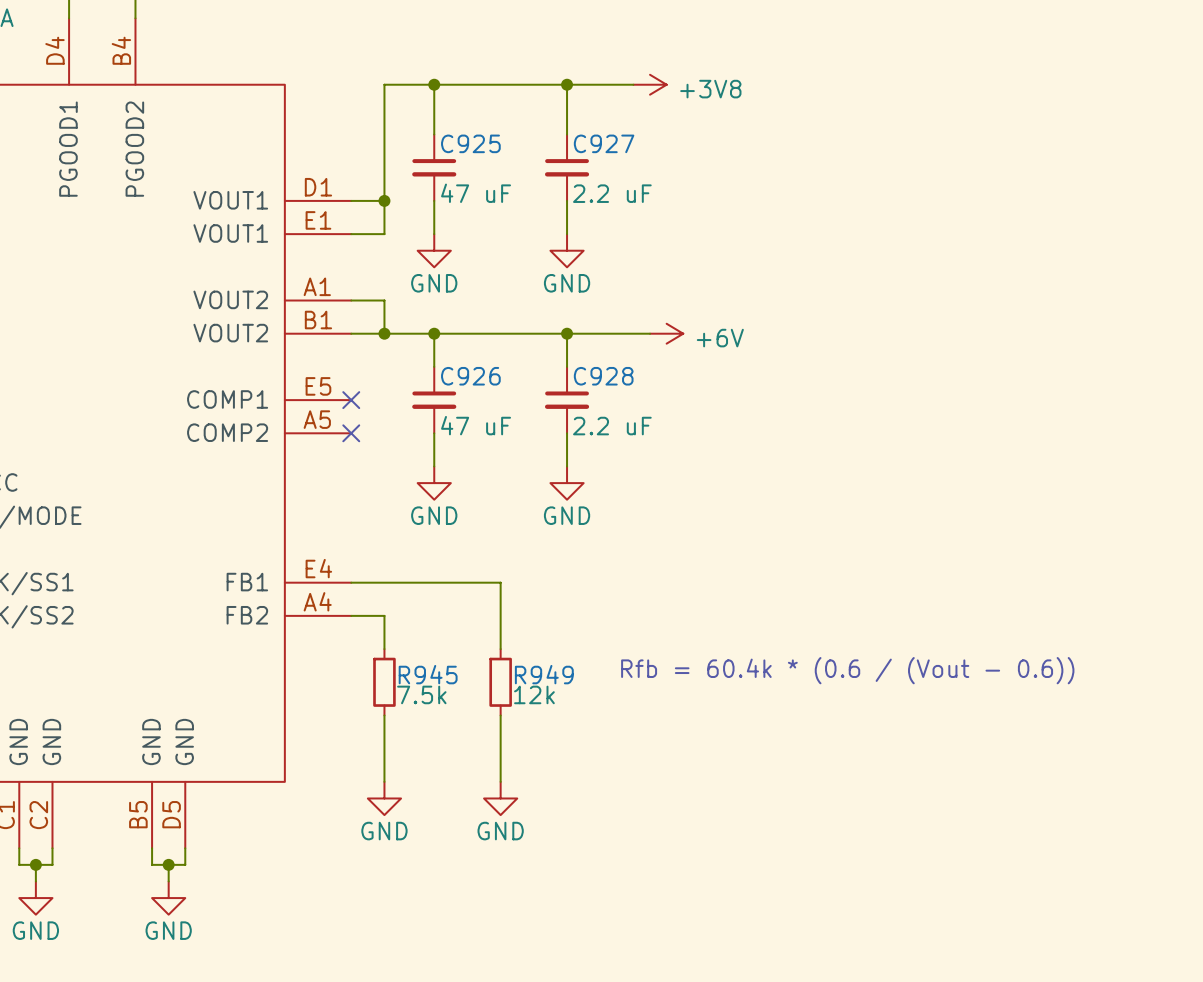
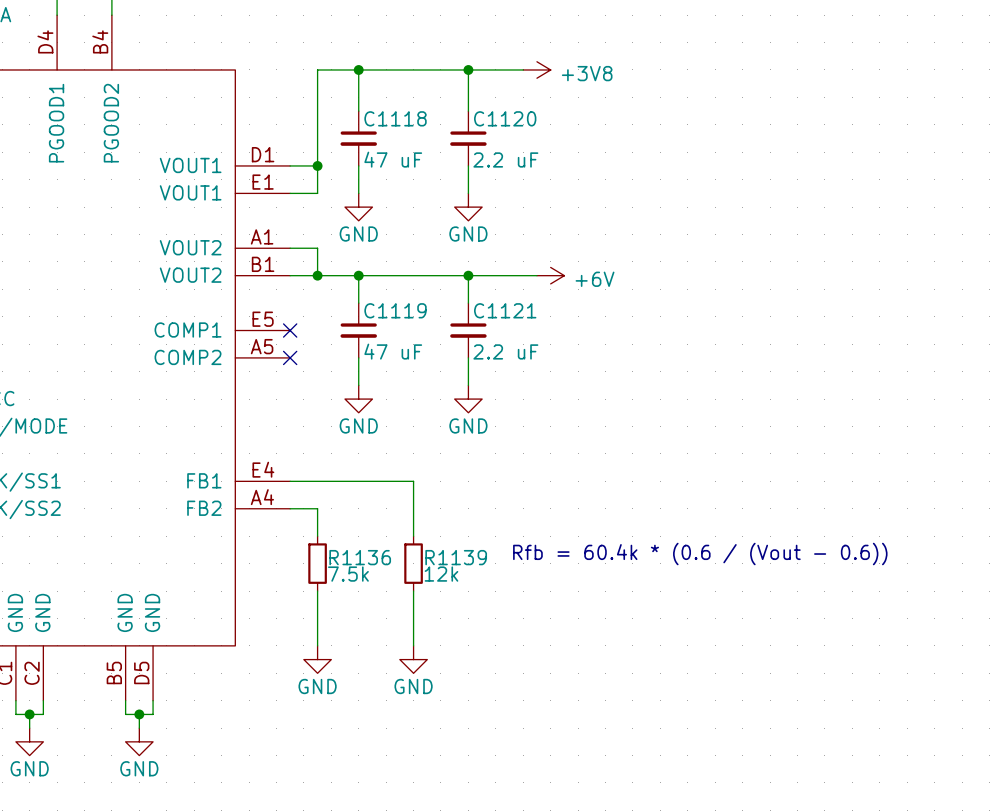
C925 name: C925 (470, 143) -> C1118 (395, 118)
C927 name: C927 (604, 143) -> C1120 (505, 118)
C926 name: C926 (470, 376) -> C1119 (395, 310)
C928 name: C928 (603, 376) -> C1121 (505, 310)
R945 name: R945 (428, 674) -> R1136 (360, 557)
R949 name: R949 (544, 674) -> R1139 (456, 557)

